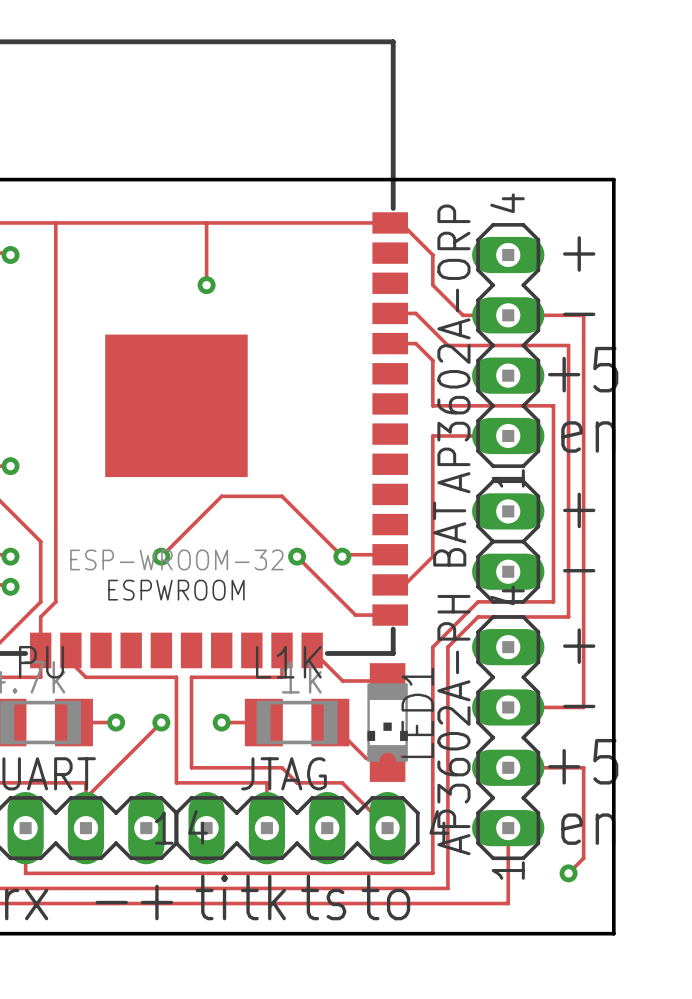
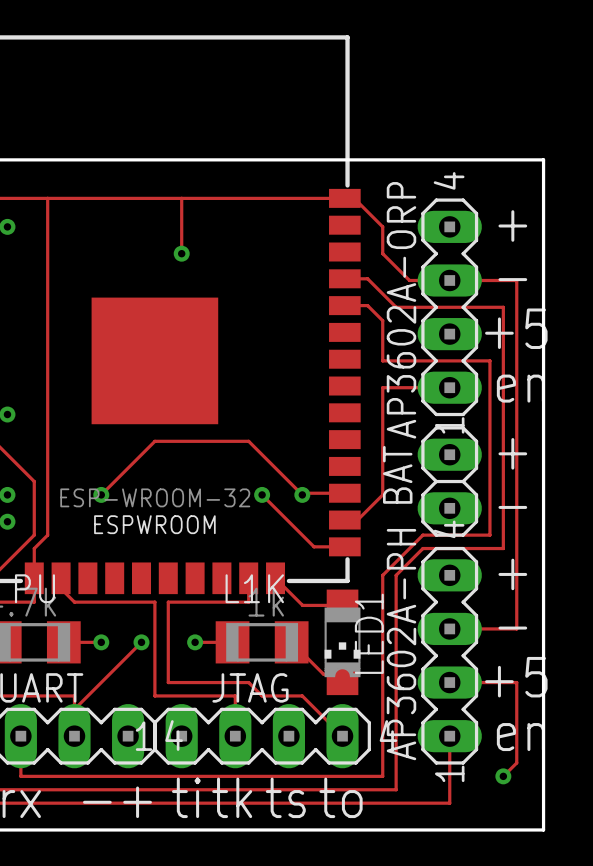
track: (221, 496) (161, 556) -> (195, 441) (154, 441) (101, 494)
via position: (161, 556) -> (101, 494)

